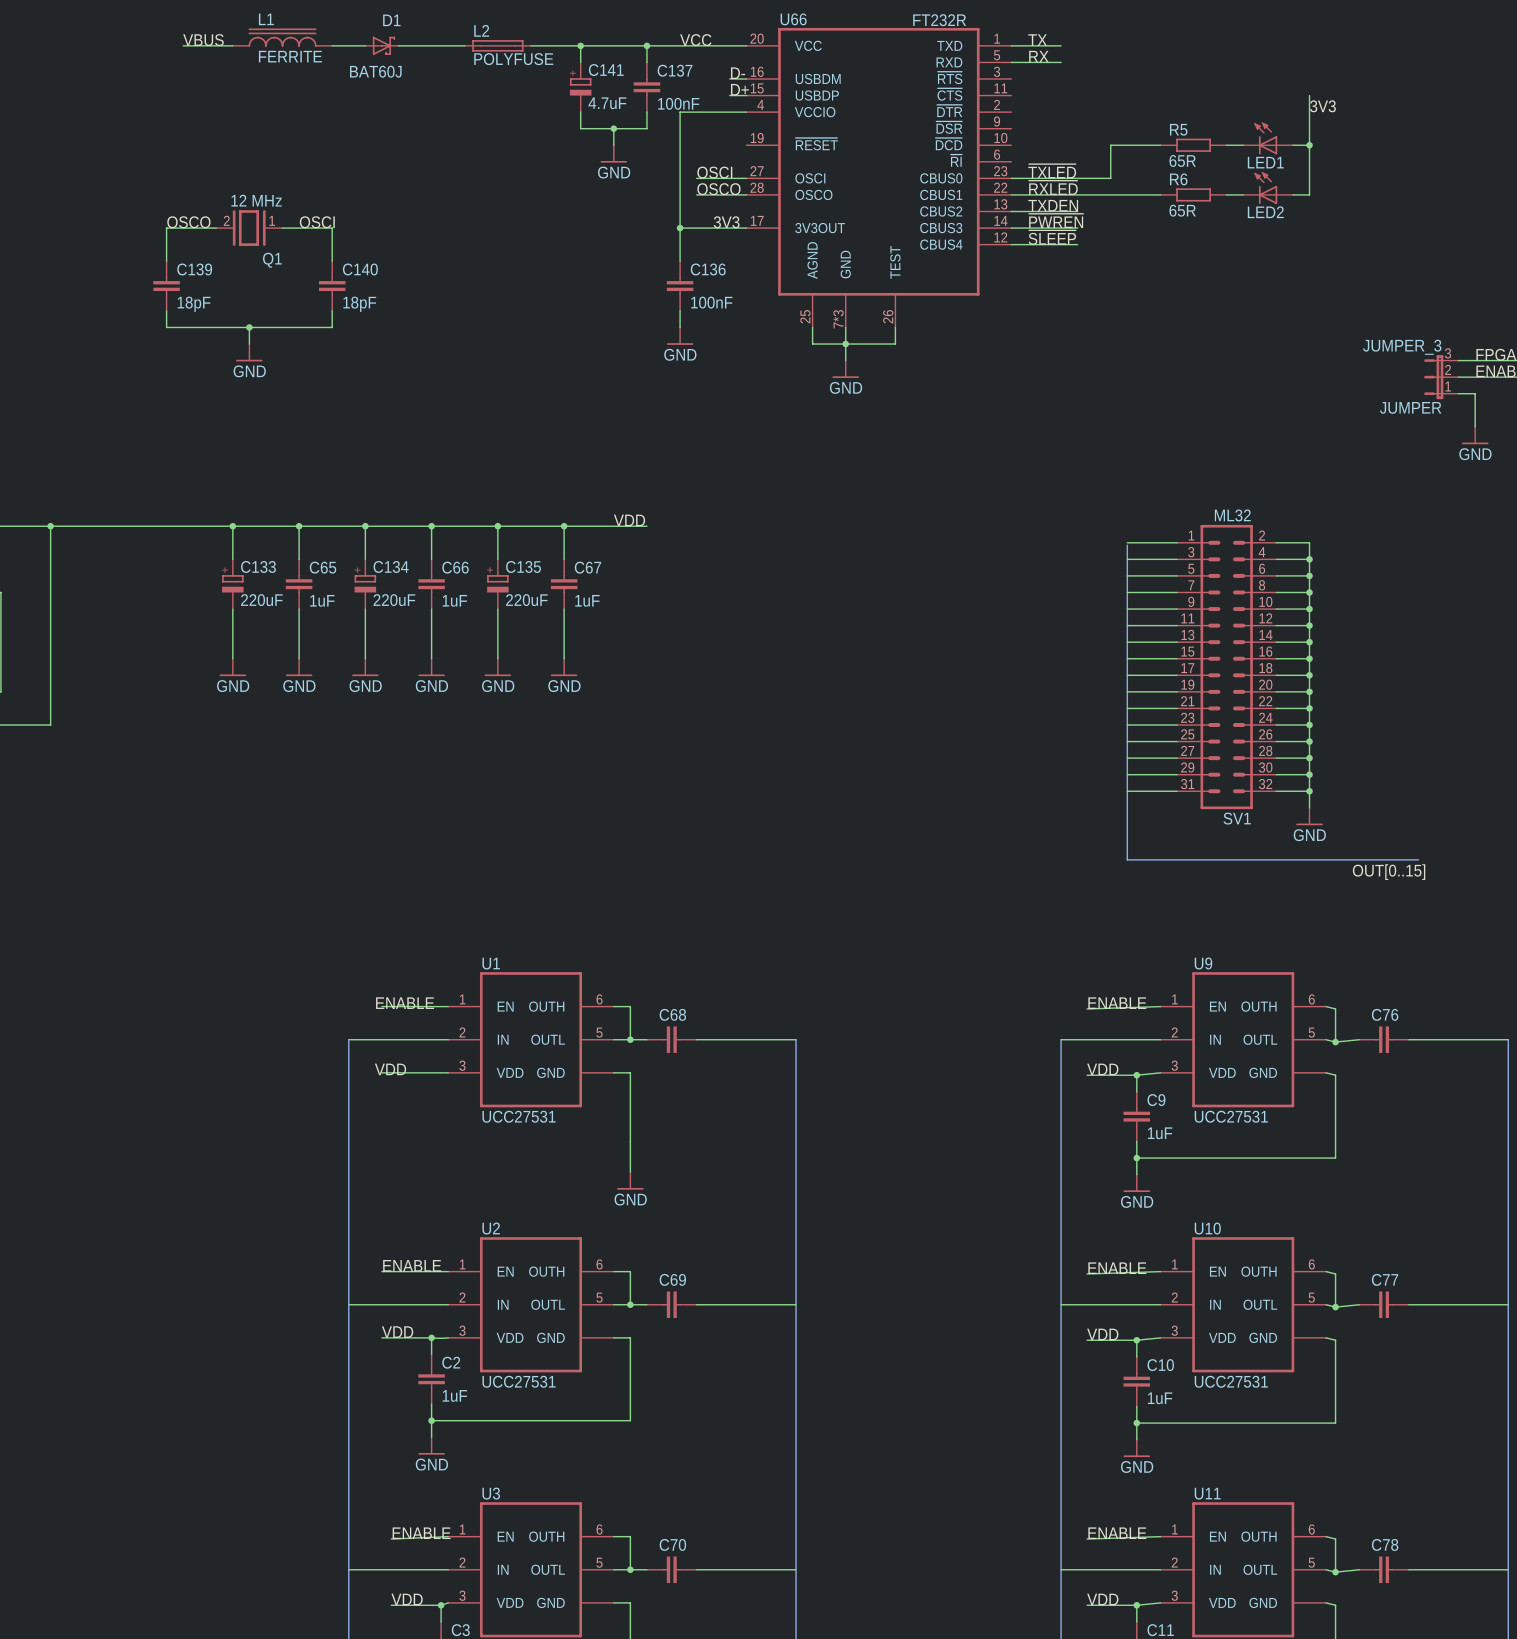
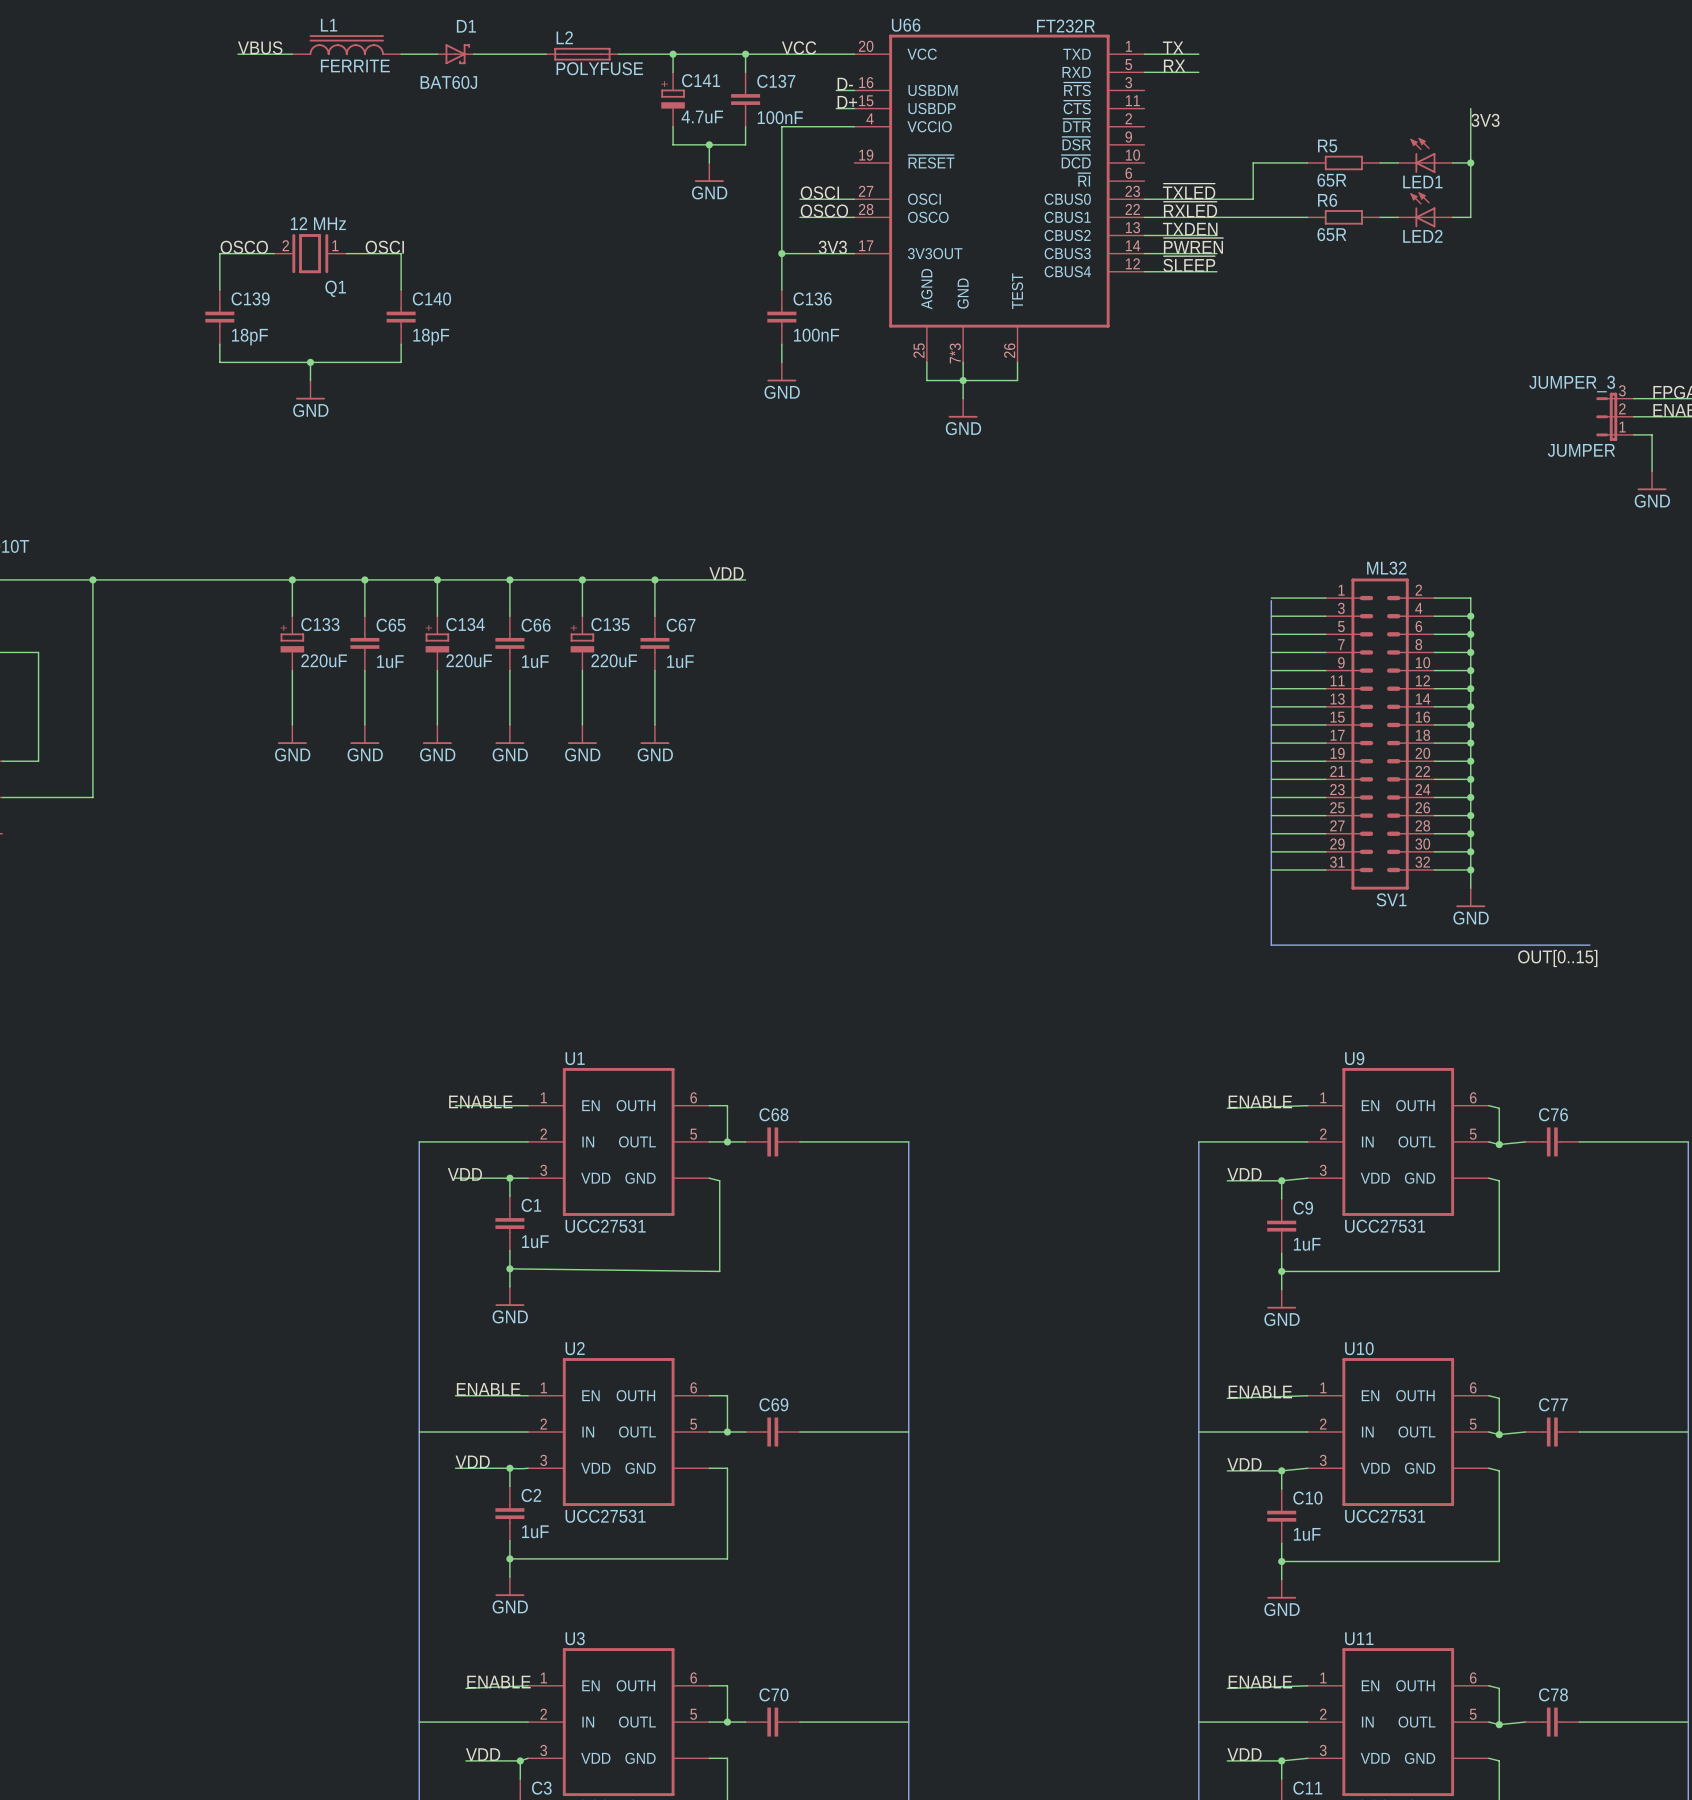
wire: none -> (509, 1178) (509, 1196)
junction: none -> (509, 1178)
wire: (613, 1072) (630, 1072) (630, 1172) -> (709, 1178) (719, 1180) (719, 1271) (509, 1268)
C1: none -> 1uF (509, 1223)
wire: none -> (509, 1250) (509, 1286)
junction: none -> (509, 1268)
power symbol: none -> GND (509, 1296)
power symbol: GND (630, 1180) -> none

